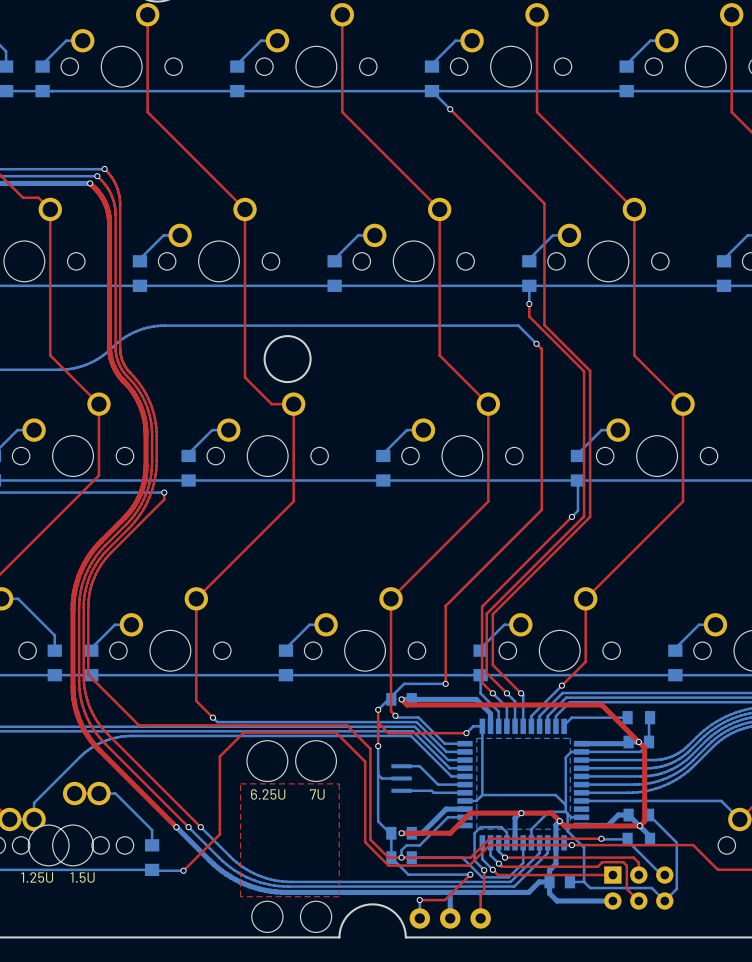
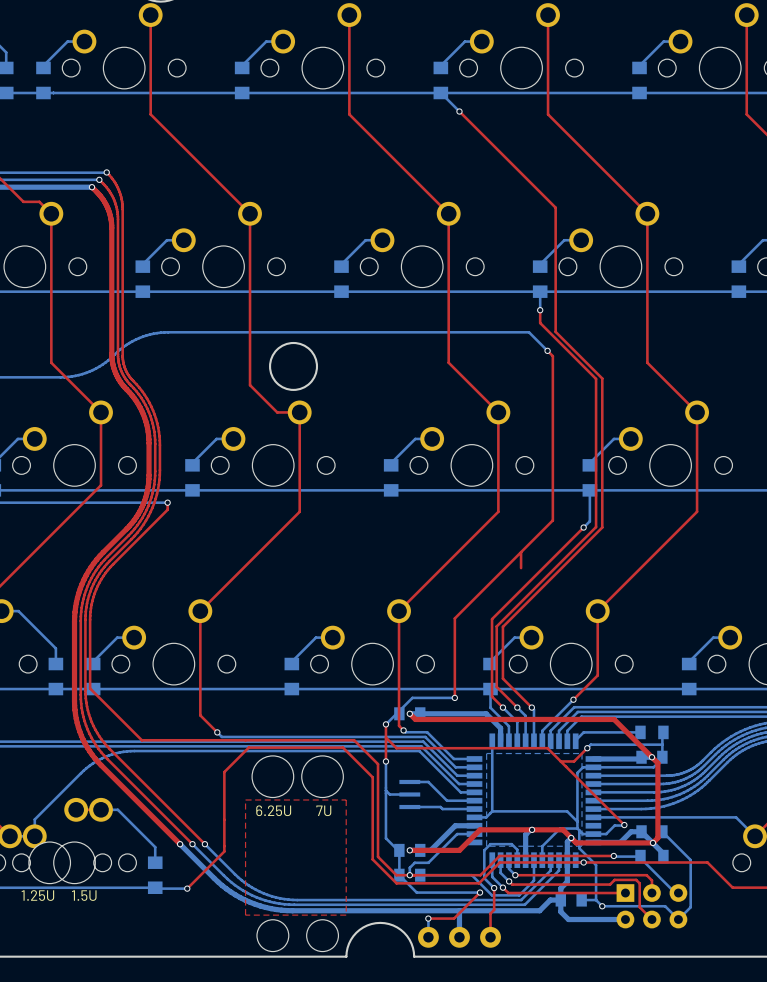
top track: none -> (521, 552) (521, 568)
bottom track: (482, 726) (473, 726) (466, 733) -> none
bottom track: none -> (662, 744) (590, 744) (587, 748)
top track: none -> (476, 748) (547, 748) (624, 825)
via: (466, 733) -> none
top track: none -> (587, 748) (574, 761) (560, 761)
via: none -> (587, 748)
bottom track: none -> (624, 825) (614, 825) (606, 834) (593, 834)
via: none -> (624, 825)
via: none -> (602, 906)

